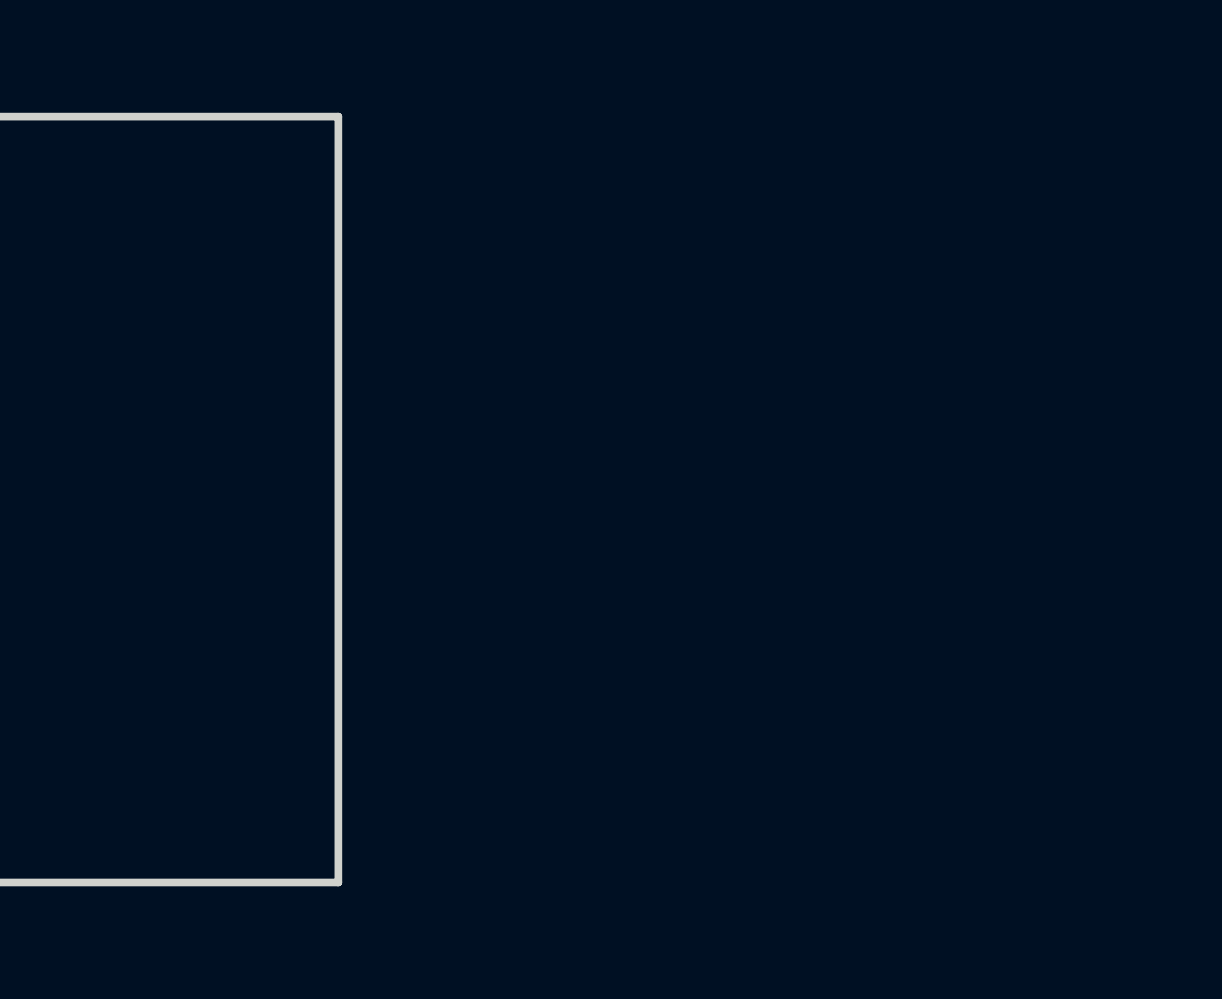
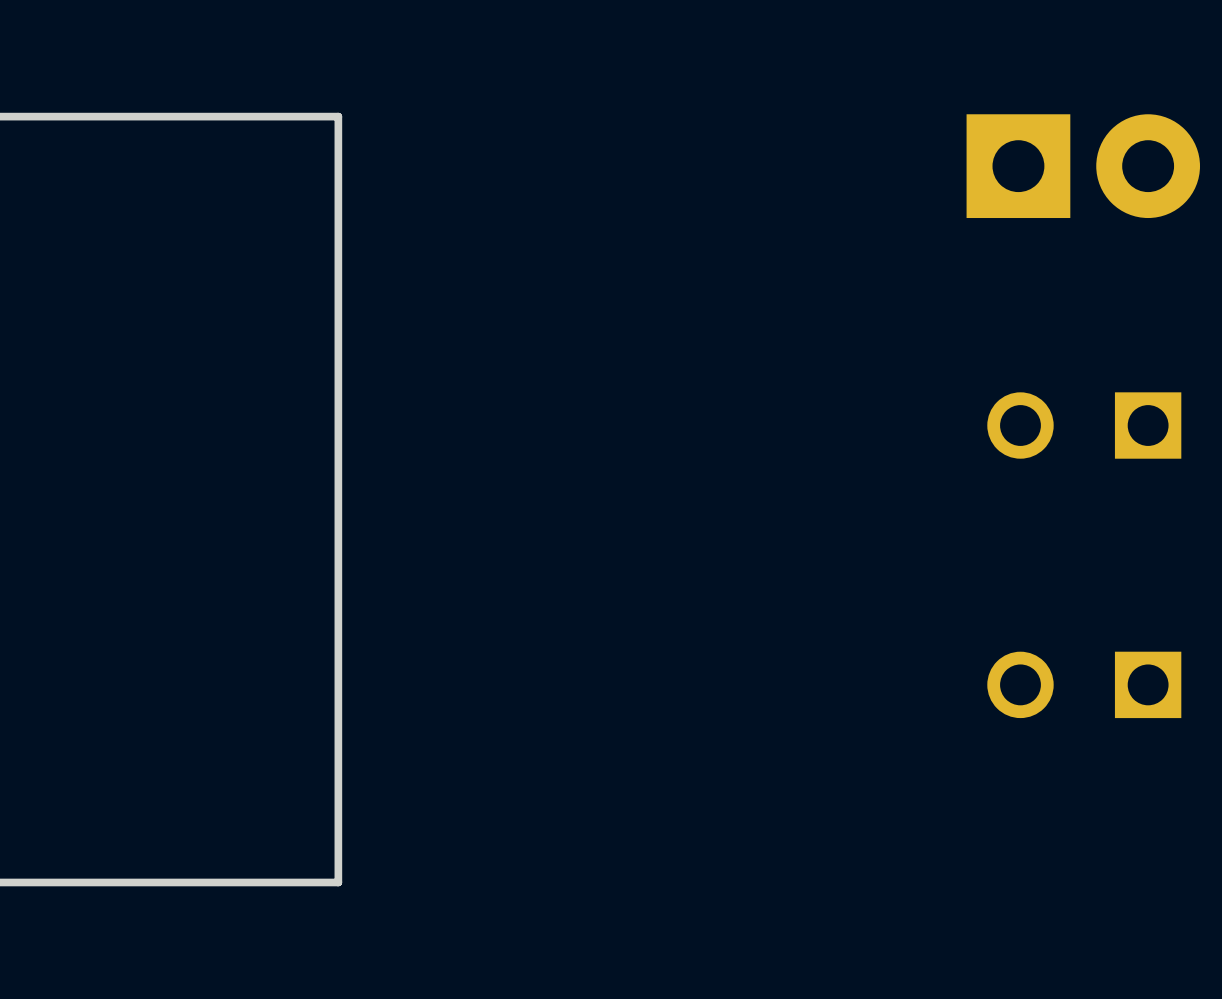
part: none -> (1083, 166)
part: none -> (1084, 425)
part: none -> (1084, 684)

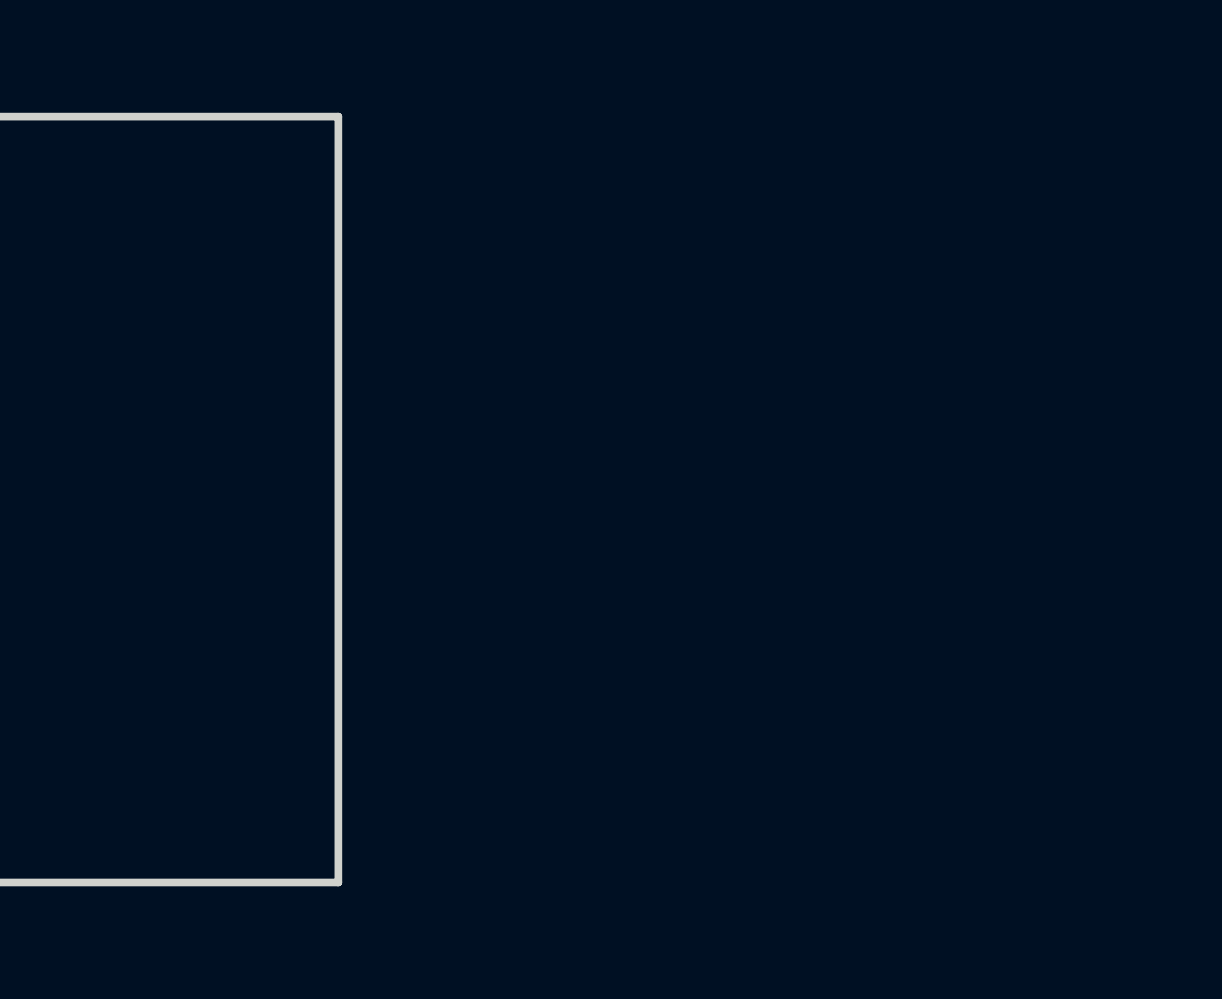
part: (1083, 166) -> none
part: (1084, 425) -> none
part: (1084, 684) -> none

